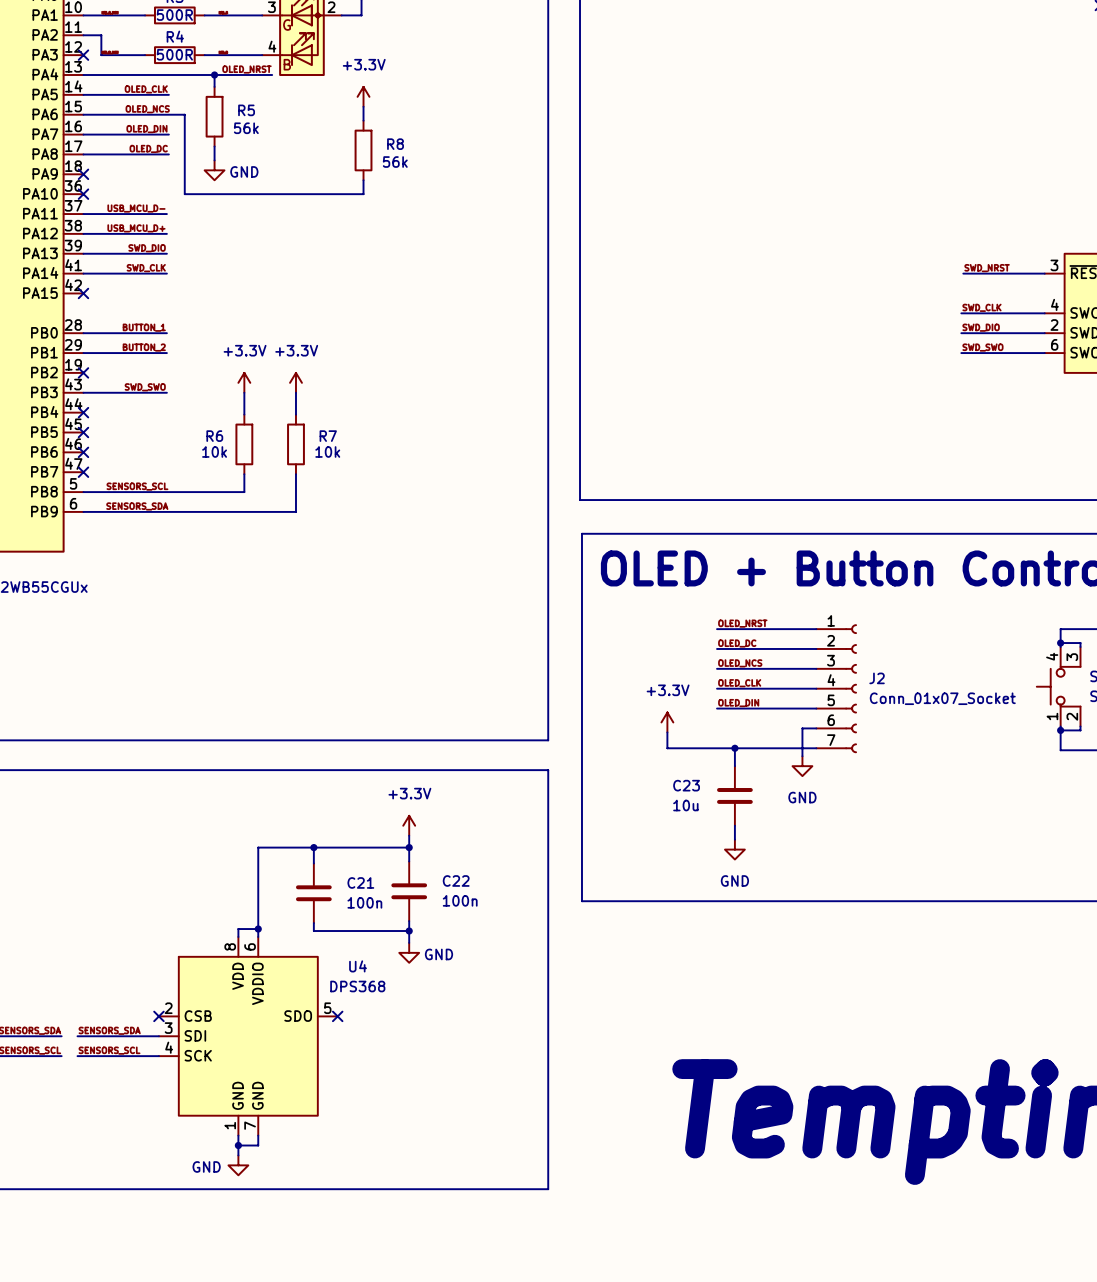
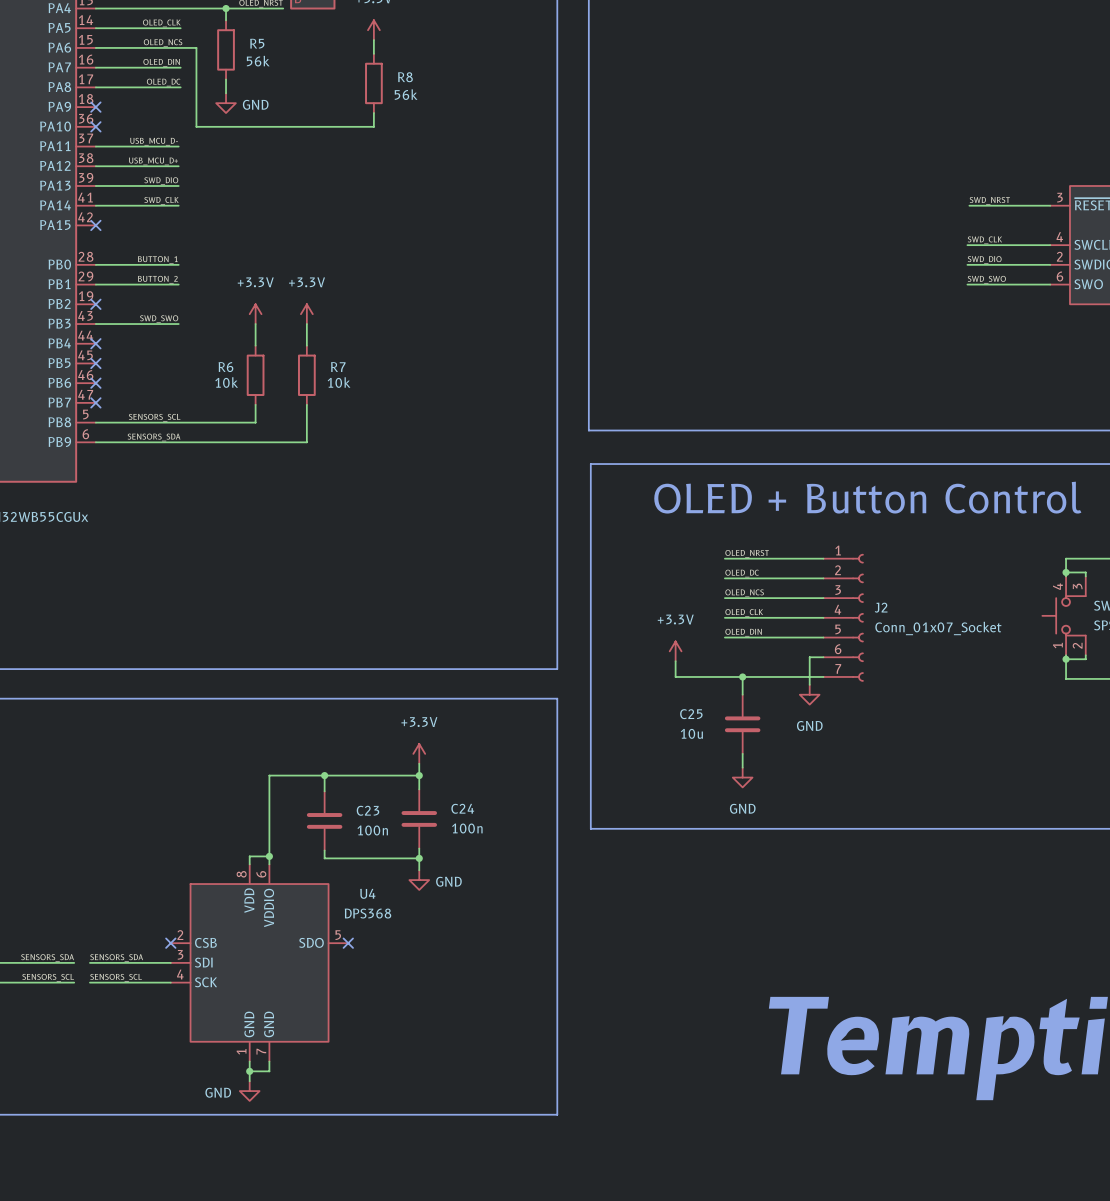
C23 name: C23 (686, 785) -> C25 (691, 714)
C22 name: C22 (456, 880) -> C24 (462, 808)
C21 name: C21 (360, 882) -> C23 (367, 810)

